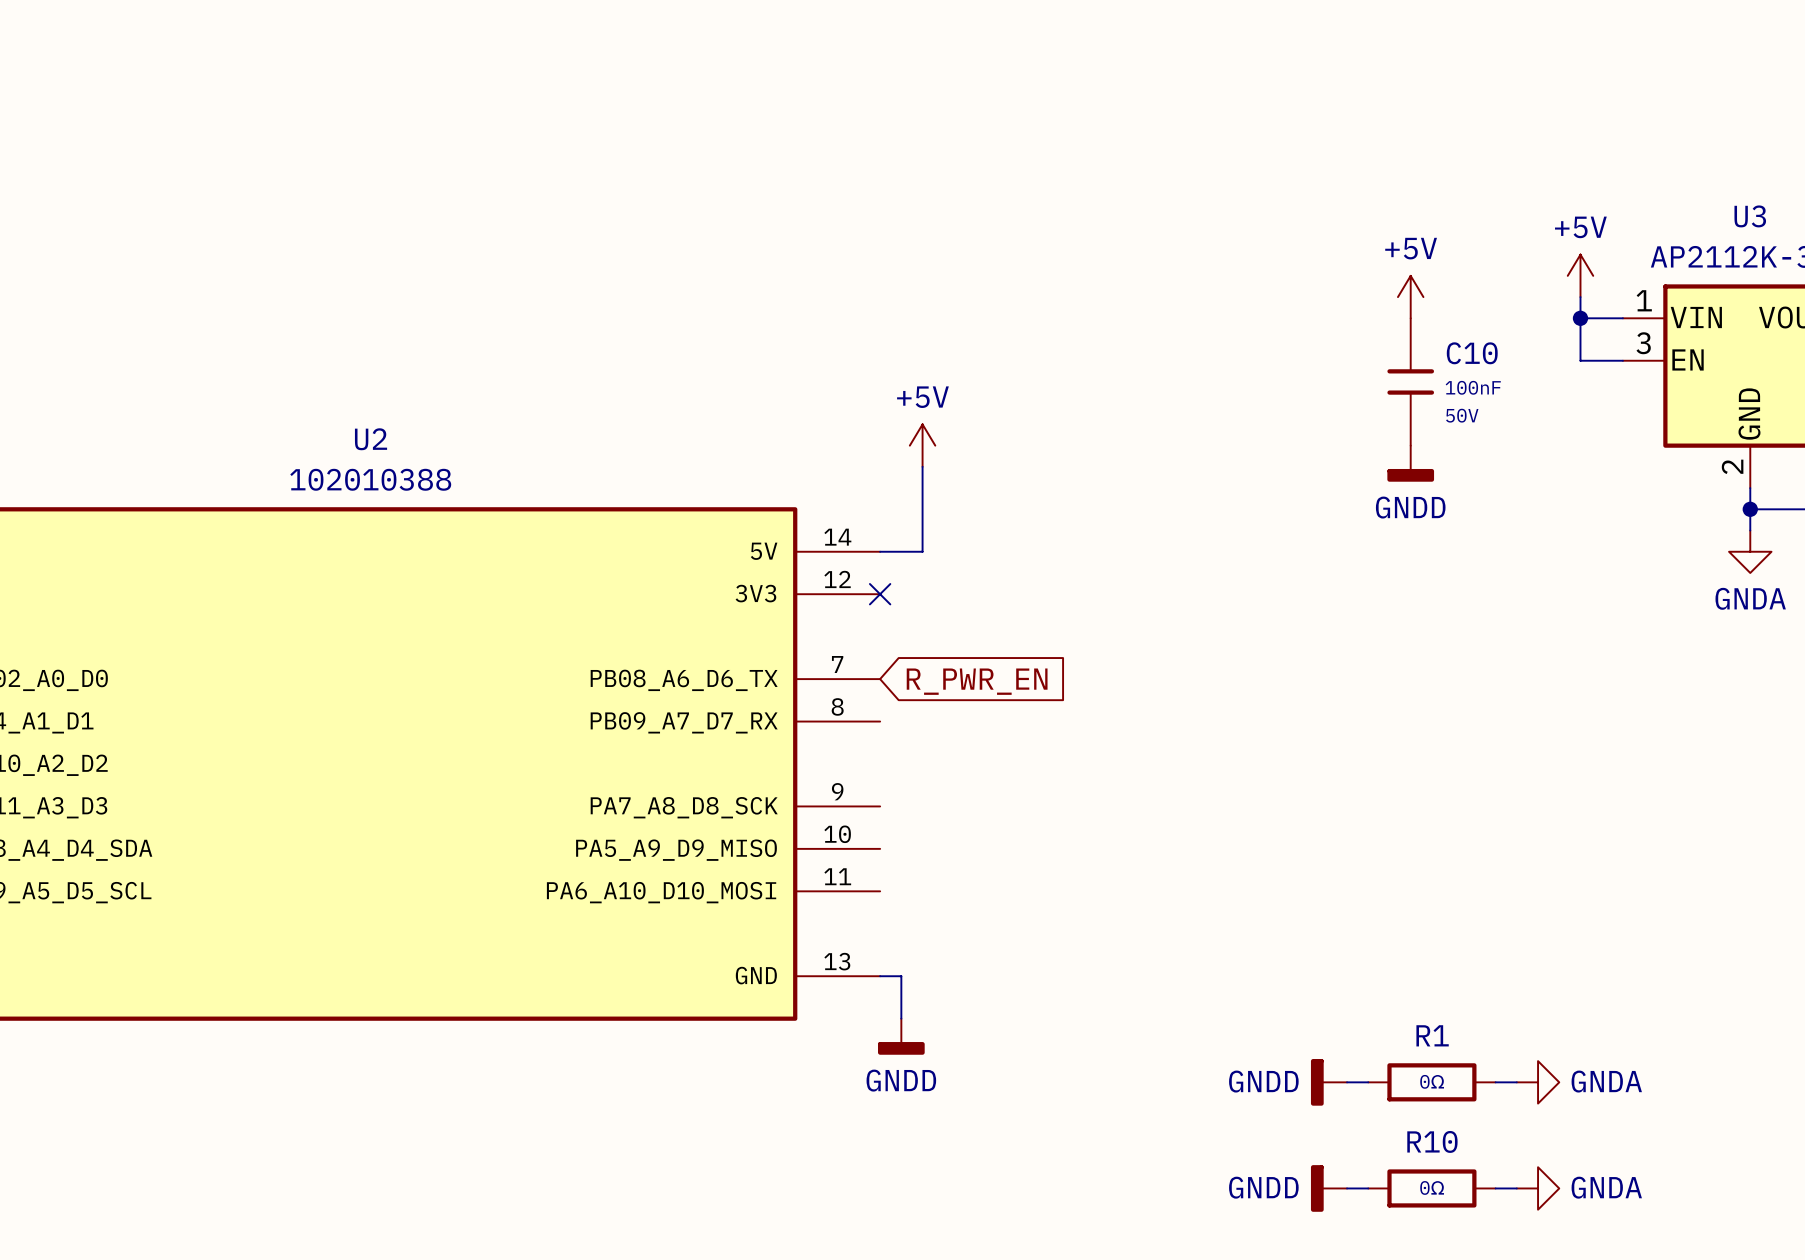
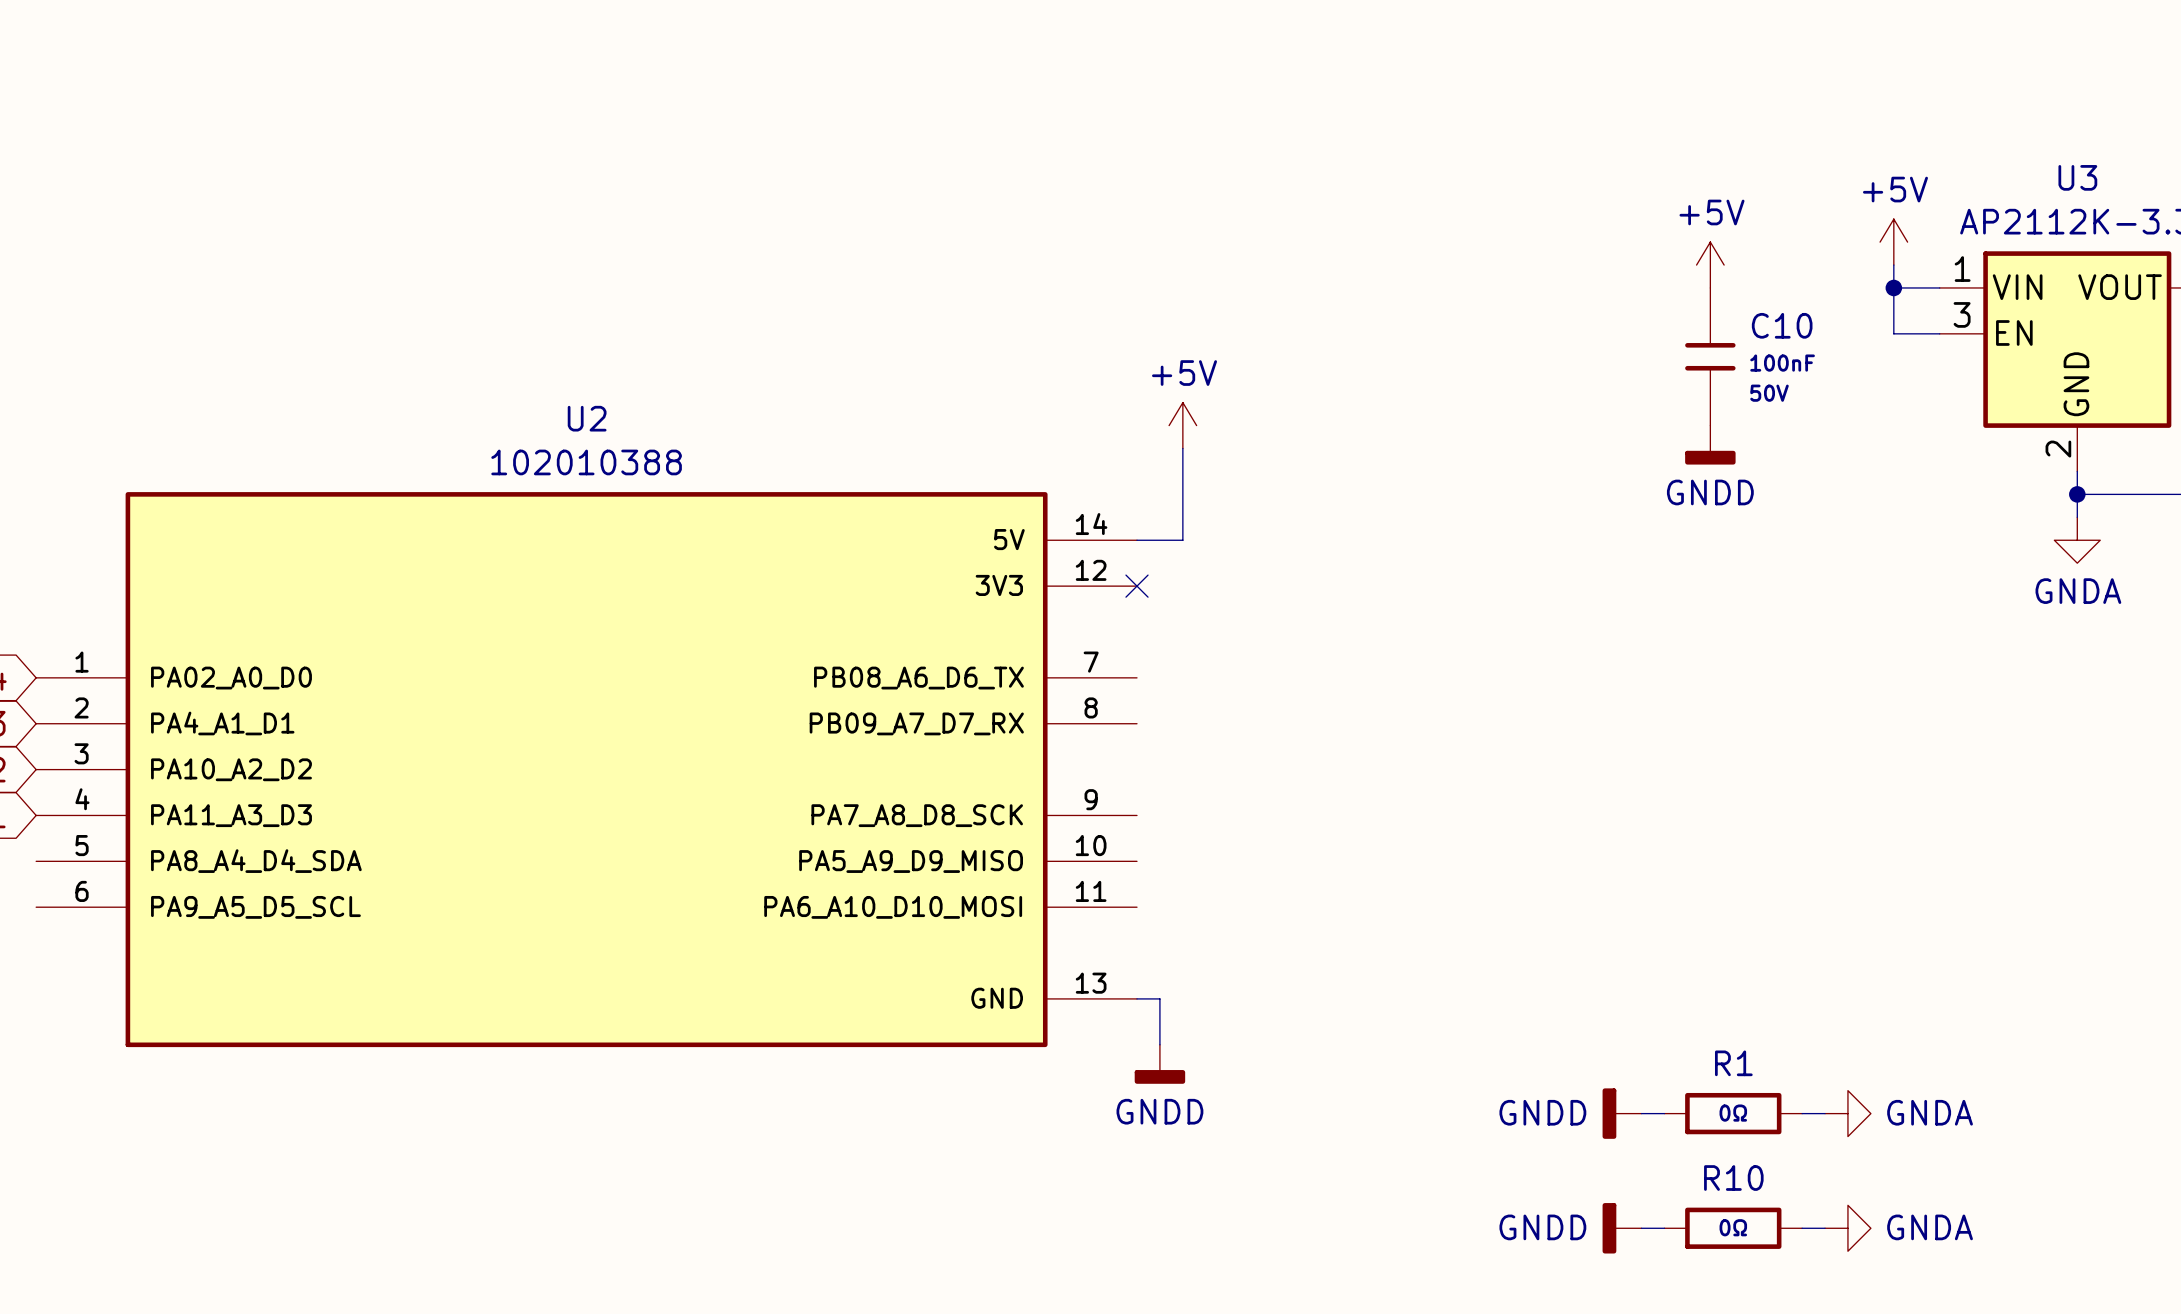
global label: R_PWR_EN (977, 681) -> none

